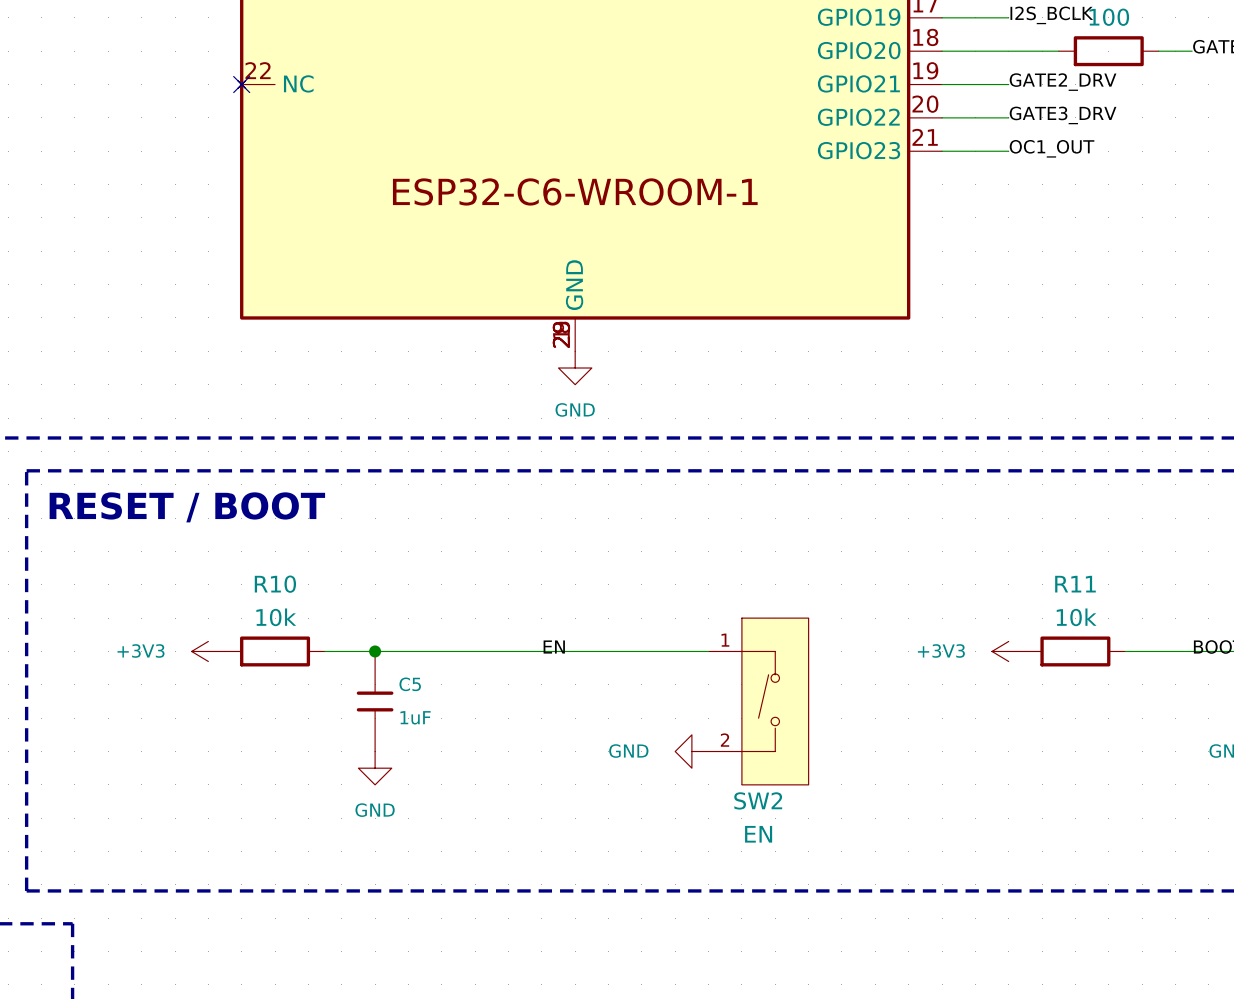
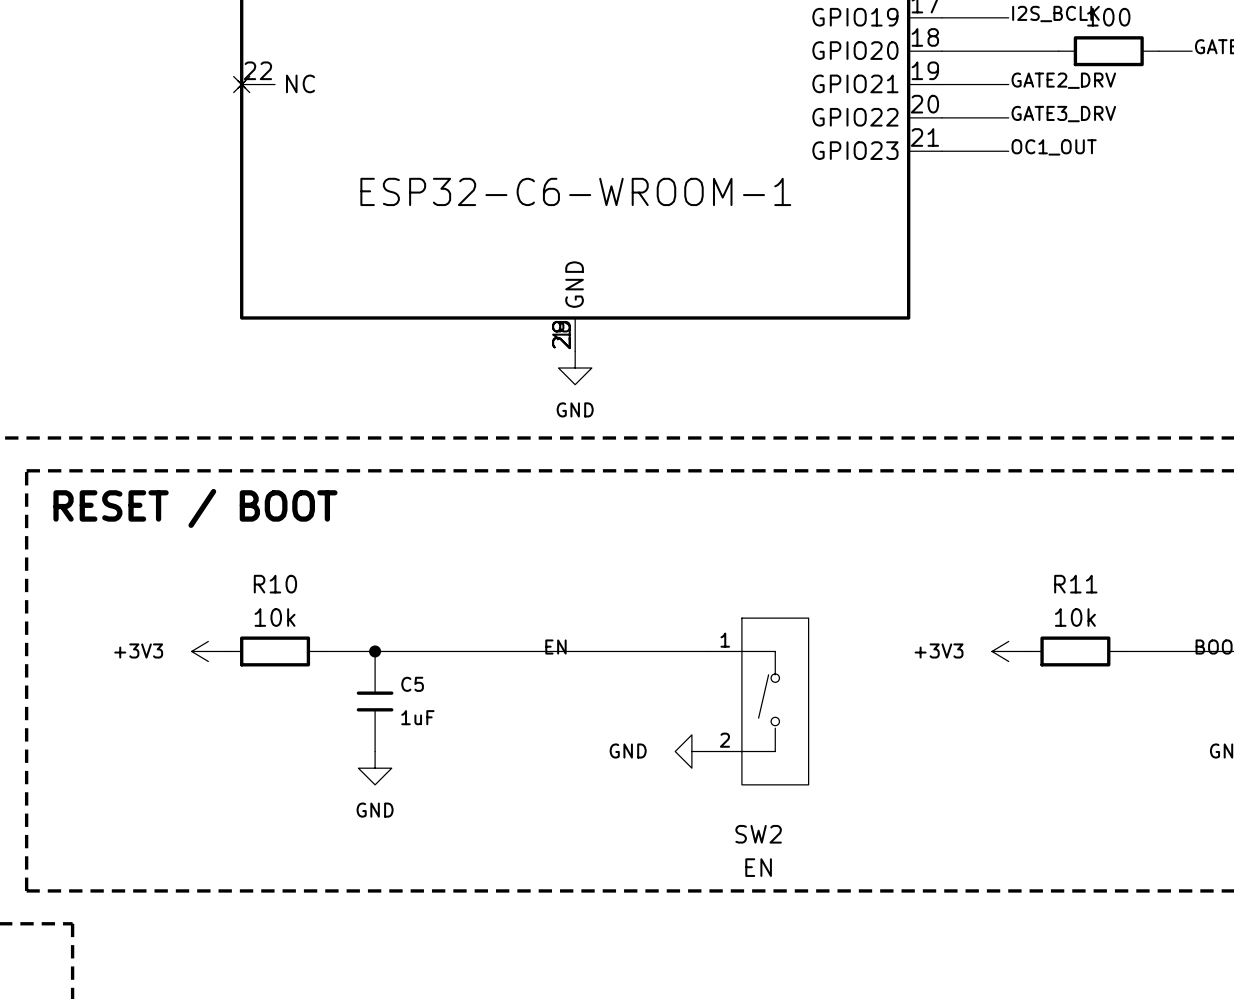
SW2 name position: SW2 (758, 800) -> SW2 (758, 834)
SW2 value position: EN (758, 834) -> EN (758, 867)

